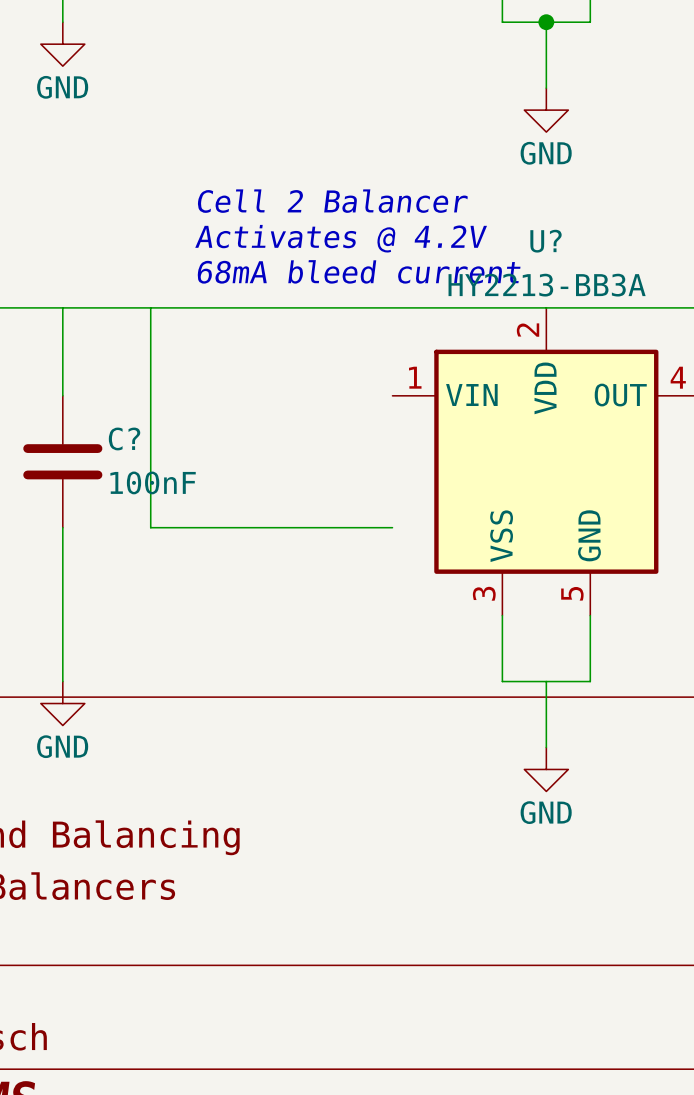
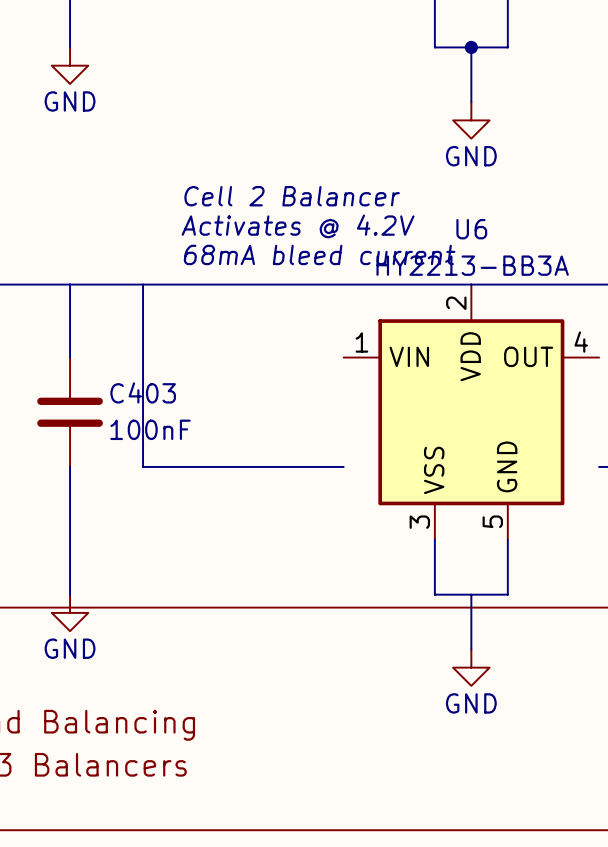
U? name: U? (546, 241) -> U6 (471, 229)
C? name: C? (124, 438) -> C403 (143, 392)

